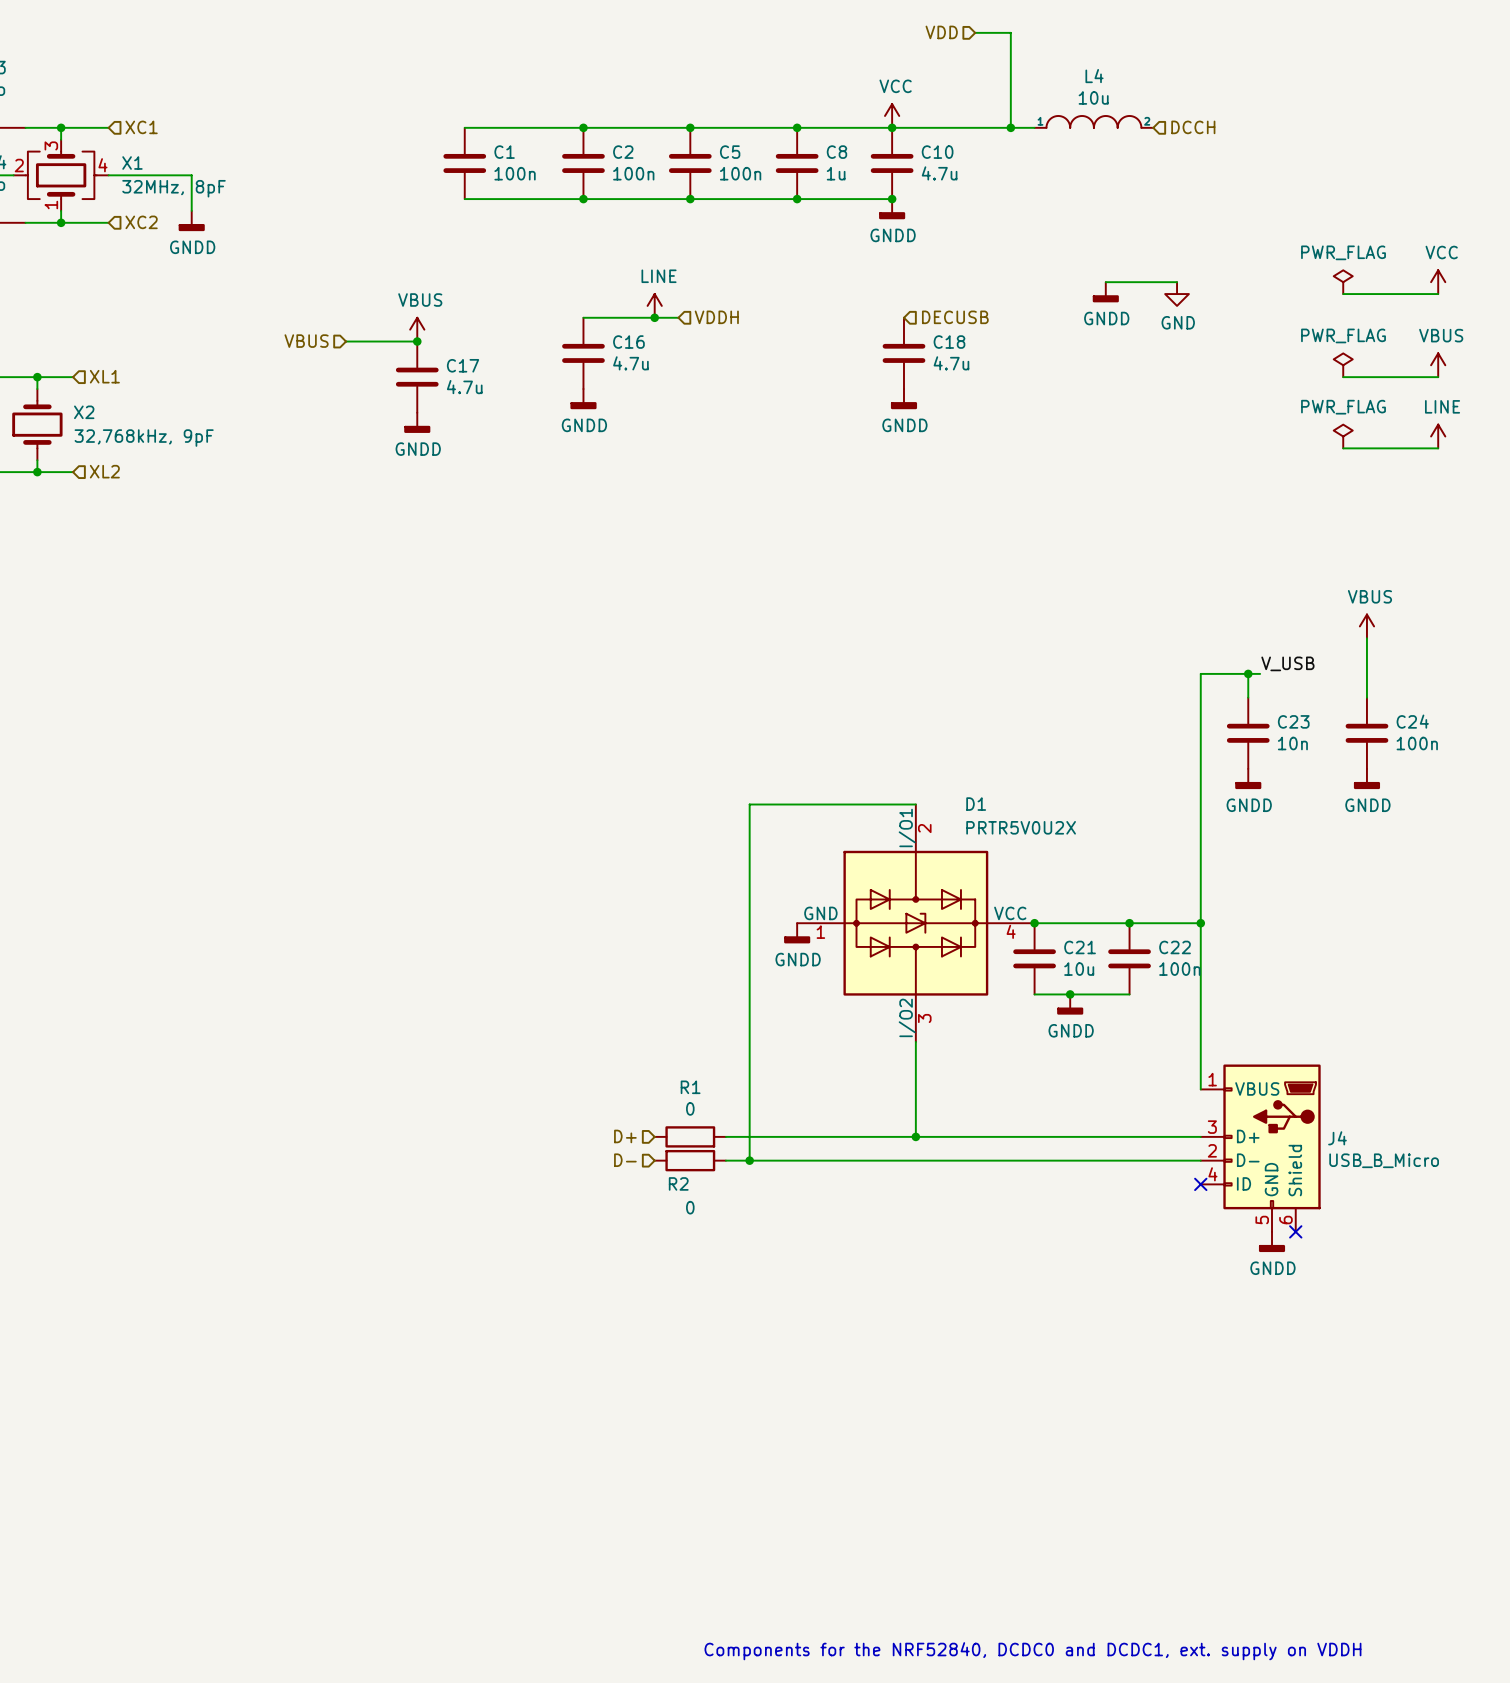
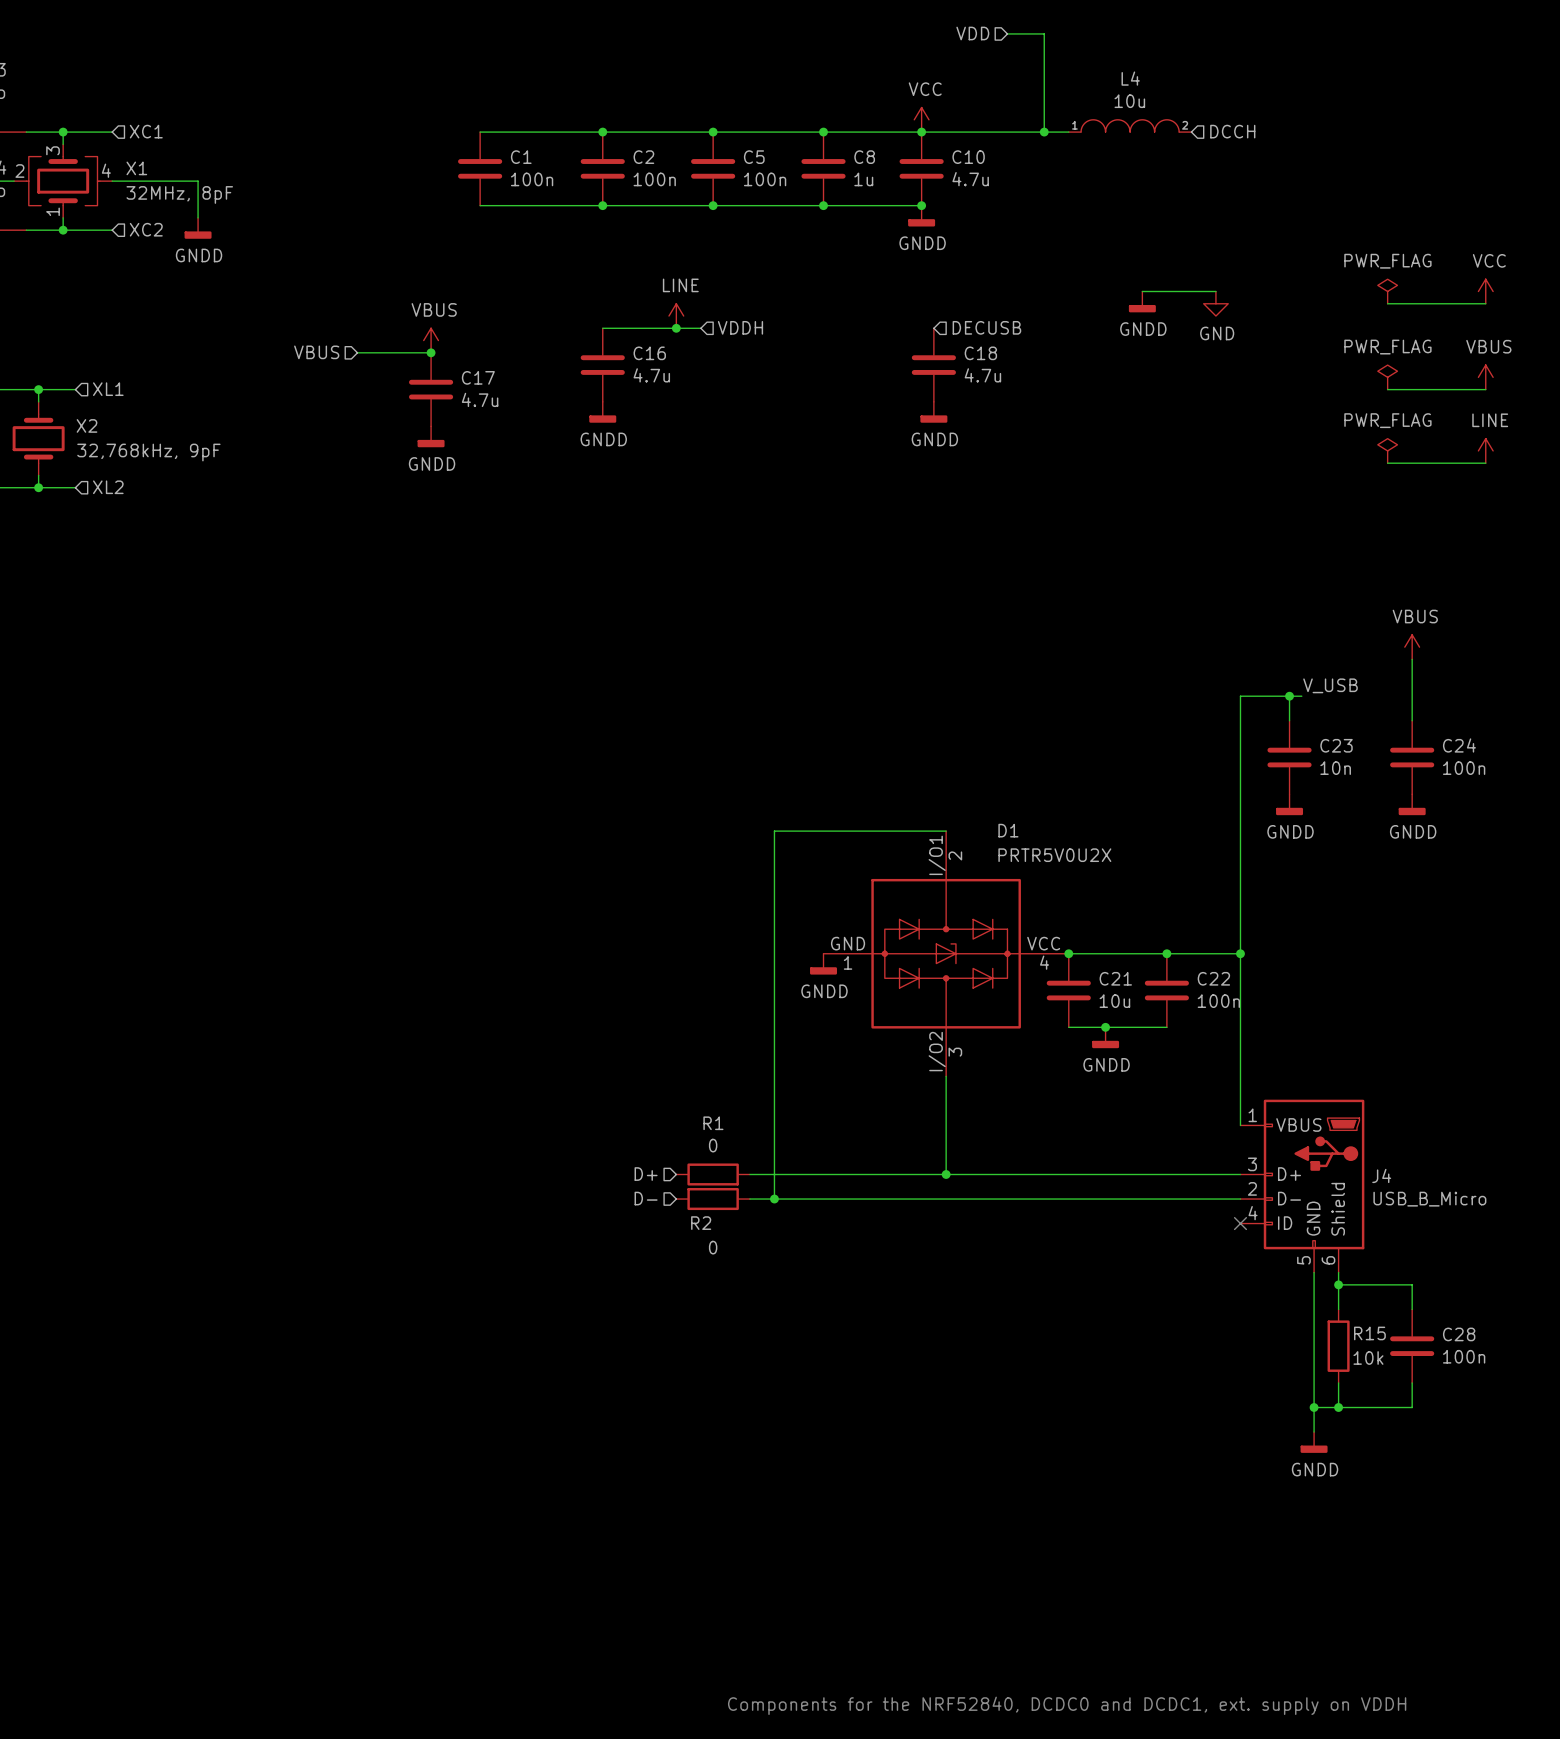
wire: none -> (1314, 1272) (1314, 1432)
wire: none -> (1338, 1272) (1338, 1309)
no-connect mark: (1295, 1231) -> none
power symbol position: GNDD (1272, 1241) -> GNDD (1314, 1442)
wire: none -> (1338, 1284) (1412, 1284) (1412, 1309)
junction: none -> (1338, 1284)
R15: none -> 10k (1338, 1346)
C28: none -> 100n (1412, 1346)
wire: none -> (1338, 1382) (1338, 1407)
wire: none -> (1412, 1382) (1412, 1407) (1314, 1407)
junction: none -> (1314, 1407)
junction: none -> (1338, 1407)

